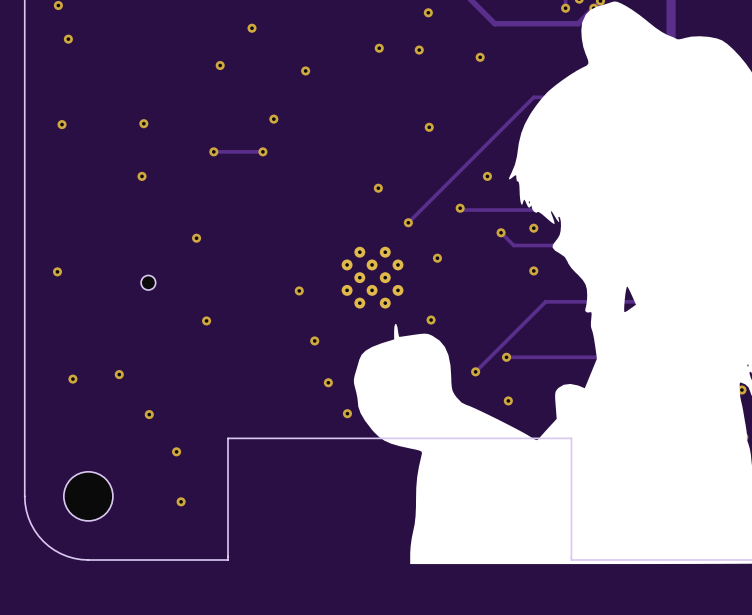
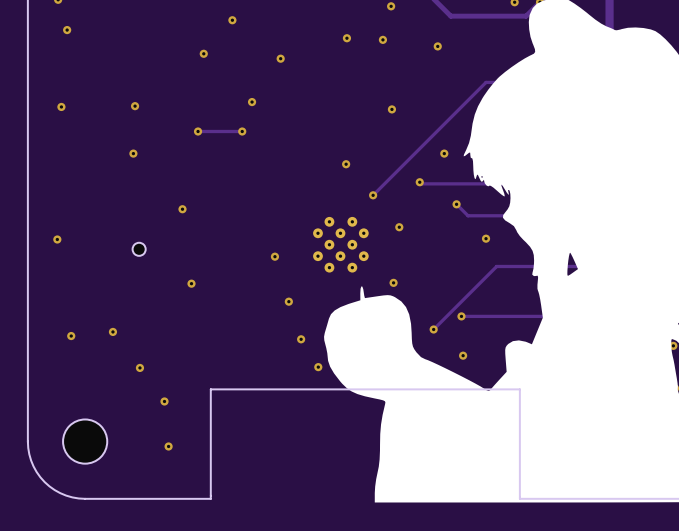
via: (533, 228) -> none

